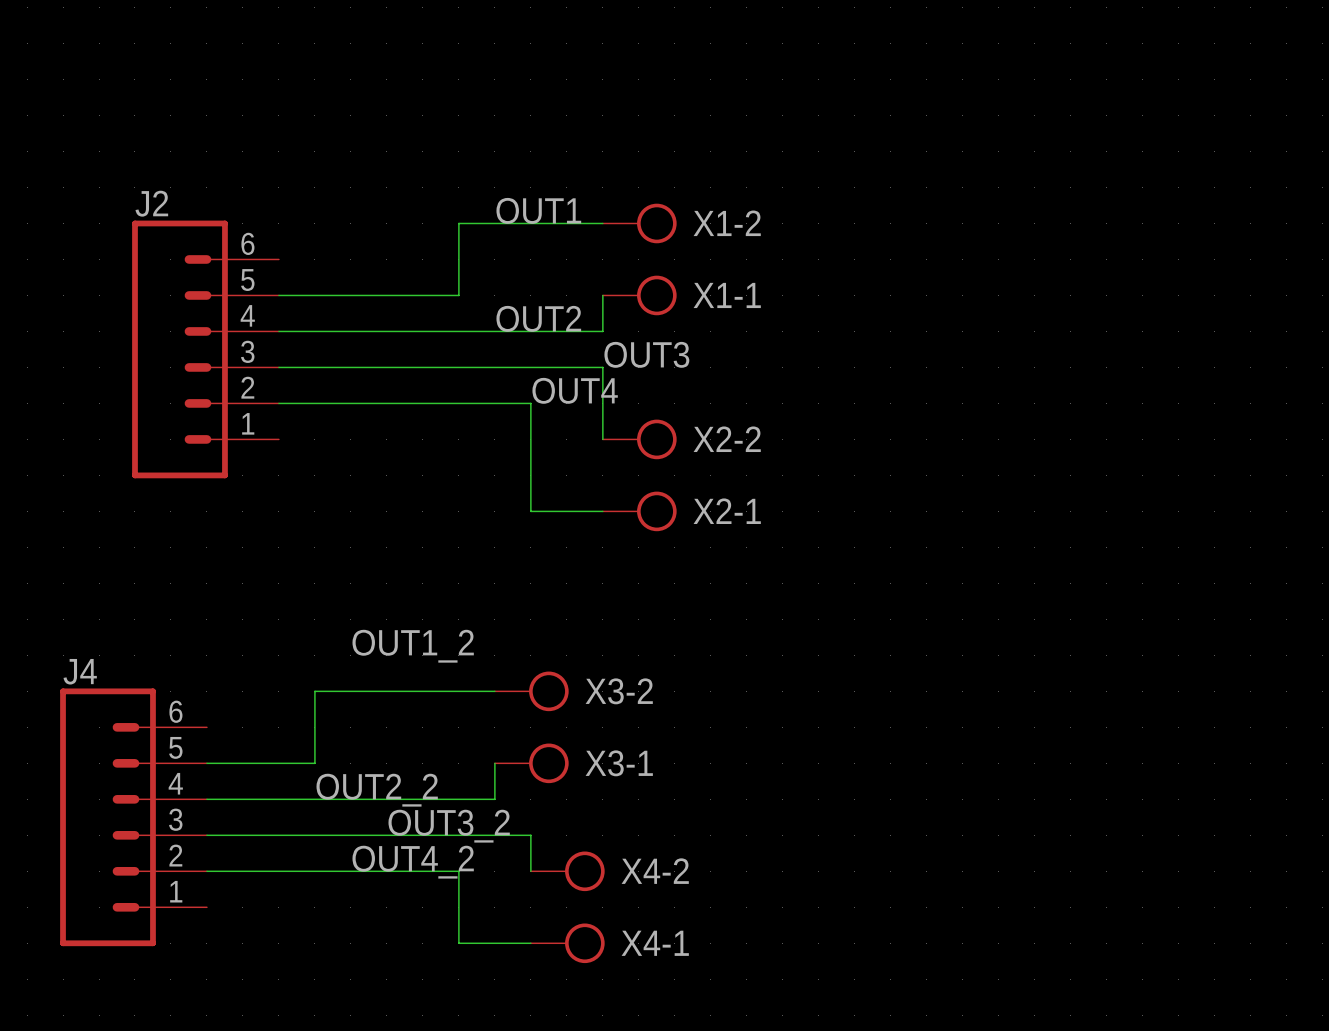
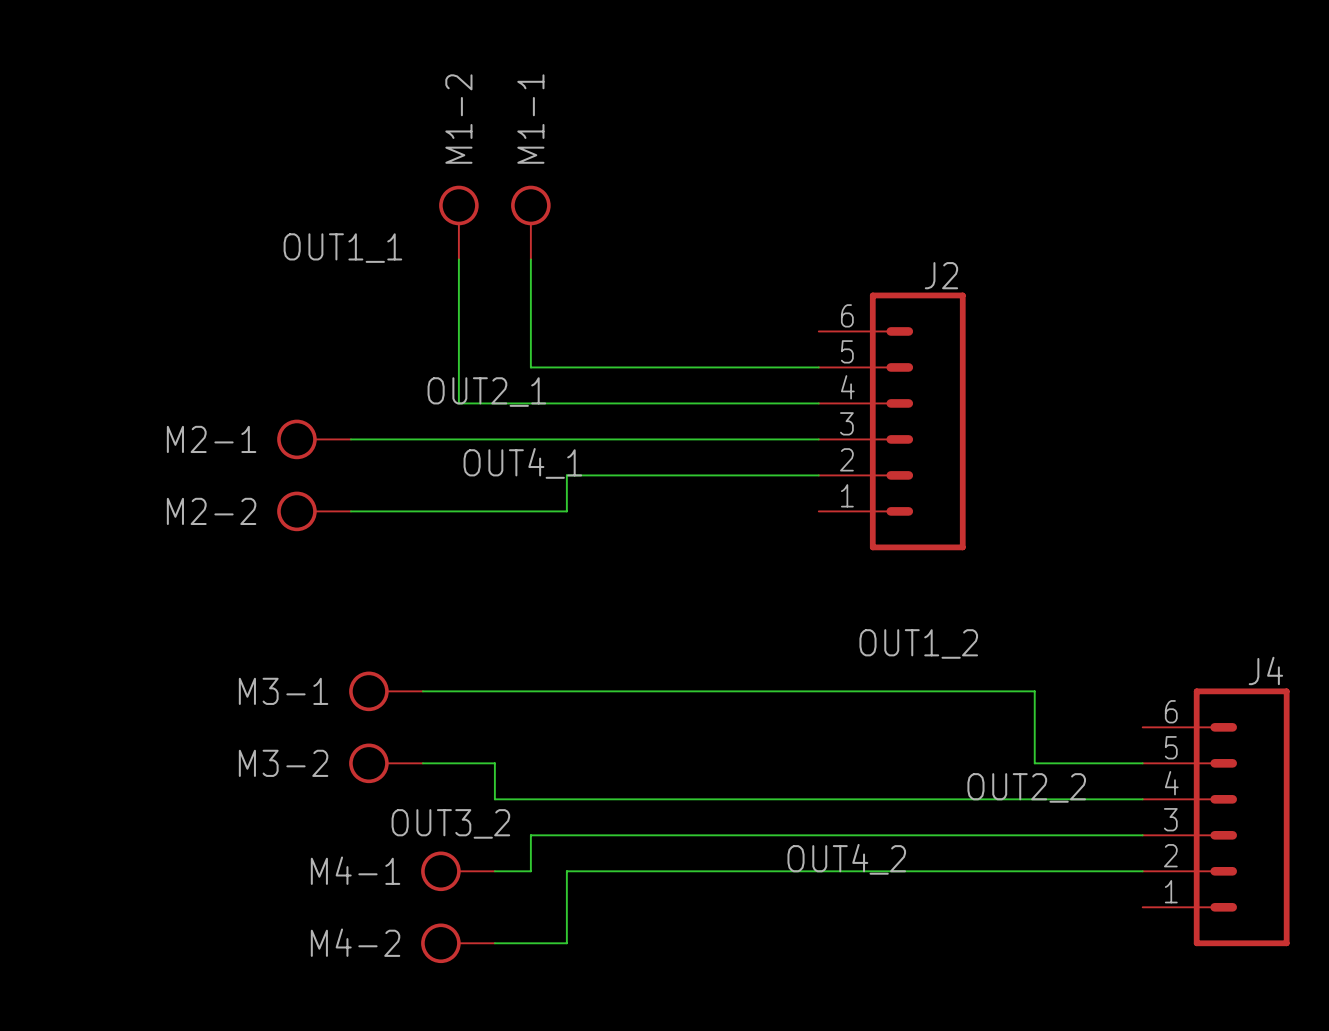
label: OUT1 (538, 210) -> none
M1-2: none -> (458, 222)
M1-1: none -> (530, 222)
wire: (602, 223) (458, 223) (458, 259) -> none
X1-2: (639, 223) -> none
label: none -> OUT1_1 (342, 248)
wire: (278, 295) (458, 295) -> (458, 403) (458, 295)
wire: (602, 295) (602, 331) (278, 331) -> none
X1-1: (639, 295) -> none
label: OUT2 (538, 318) -> none
J2 flip: as is (179, 349) -> left-right (917, 421)
J2 position: (205, 349) -> (892, 421)
label: OUT3 (646, 354) -> none
wire: (278, 367) (530, 367) -> (530, 259) (530, 367)
wire: (602, 367) (602, 439) -> (602, 367) (818, 367)
label: OUT4 (575, 390) -> none
label: none -> OUT2_1 (486, 392)
wire: (278, 403) (458, 403) -> none
wire: (530, 403) (530, 511) -> (350, 511) (530, 511)
wire: none -> (530, 403) (818, 403)
M2-1: none -> (314, 439)
wire: none -> (350, 439) (818, 439)
X2-2: (639, 439) -> none
label: none -> OUT4_1 (522, 463)
M2-2: none -> (314, 511)
wire: (566, 511) (602, 511) -> (566, 511) (566, 475) (818, 475)
X2-1: (639, 511) -> none
label: OUT1_2 (413, 646) -> none
label: none -> OUT1_2 (918, 643)
M3-1: none -> (386, 691)
wire: (422, 691) (314, 691) (314, 763) (206, 763) -> none
wire: none -> (494, 691) (1034, 691) (1034, 763) (1142, 763)
X3-2: (531, 691) -> none
M3-2: none -> (386, 763)
wire: none -> (422, 763) (494, 763)
X3-1: (531, 763) -> none
label: OUT2_2 (377, 790) -> none
label: none -> OUT2_2 (1026, 787)
wire: (206, 799) (494, 799) -> (1142, 799) (494, 799)
J4 flip: as is (107, 817) -> left-right (1241, 817)
J4 position: (133, 817) -> (1216, 817)
wire: (206, 835) (530, 835) -> (1142, 835) (530, 835)
label: OUT4_2 (413, 862) -> none
label: none -> OUT4_2 (846, 859)
wire: (206, 871) (458, 871) (458, 943) (494, 943) -> none
M4-1: none -> (458, 871)
wire: none -> (494, 871) (530, 871)
X4-2: (567, 871) -> none
wire: none -> (1142, 871) (566, 871) (566, 943) (530, 943)
M4-2: none -> (458, 943)
X4-1: (567, 943) -> none

